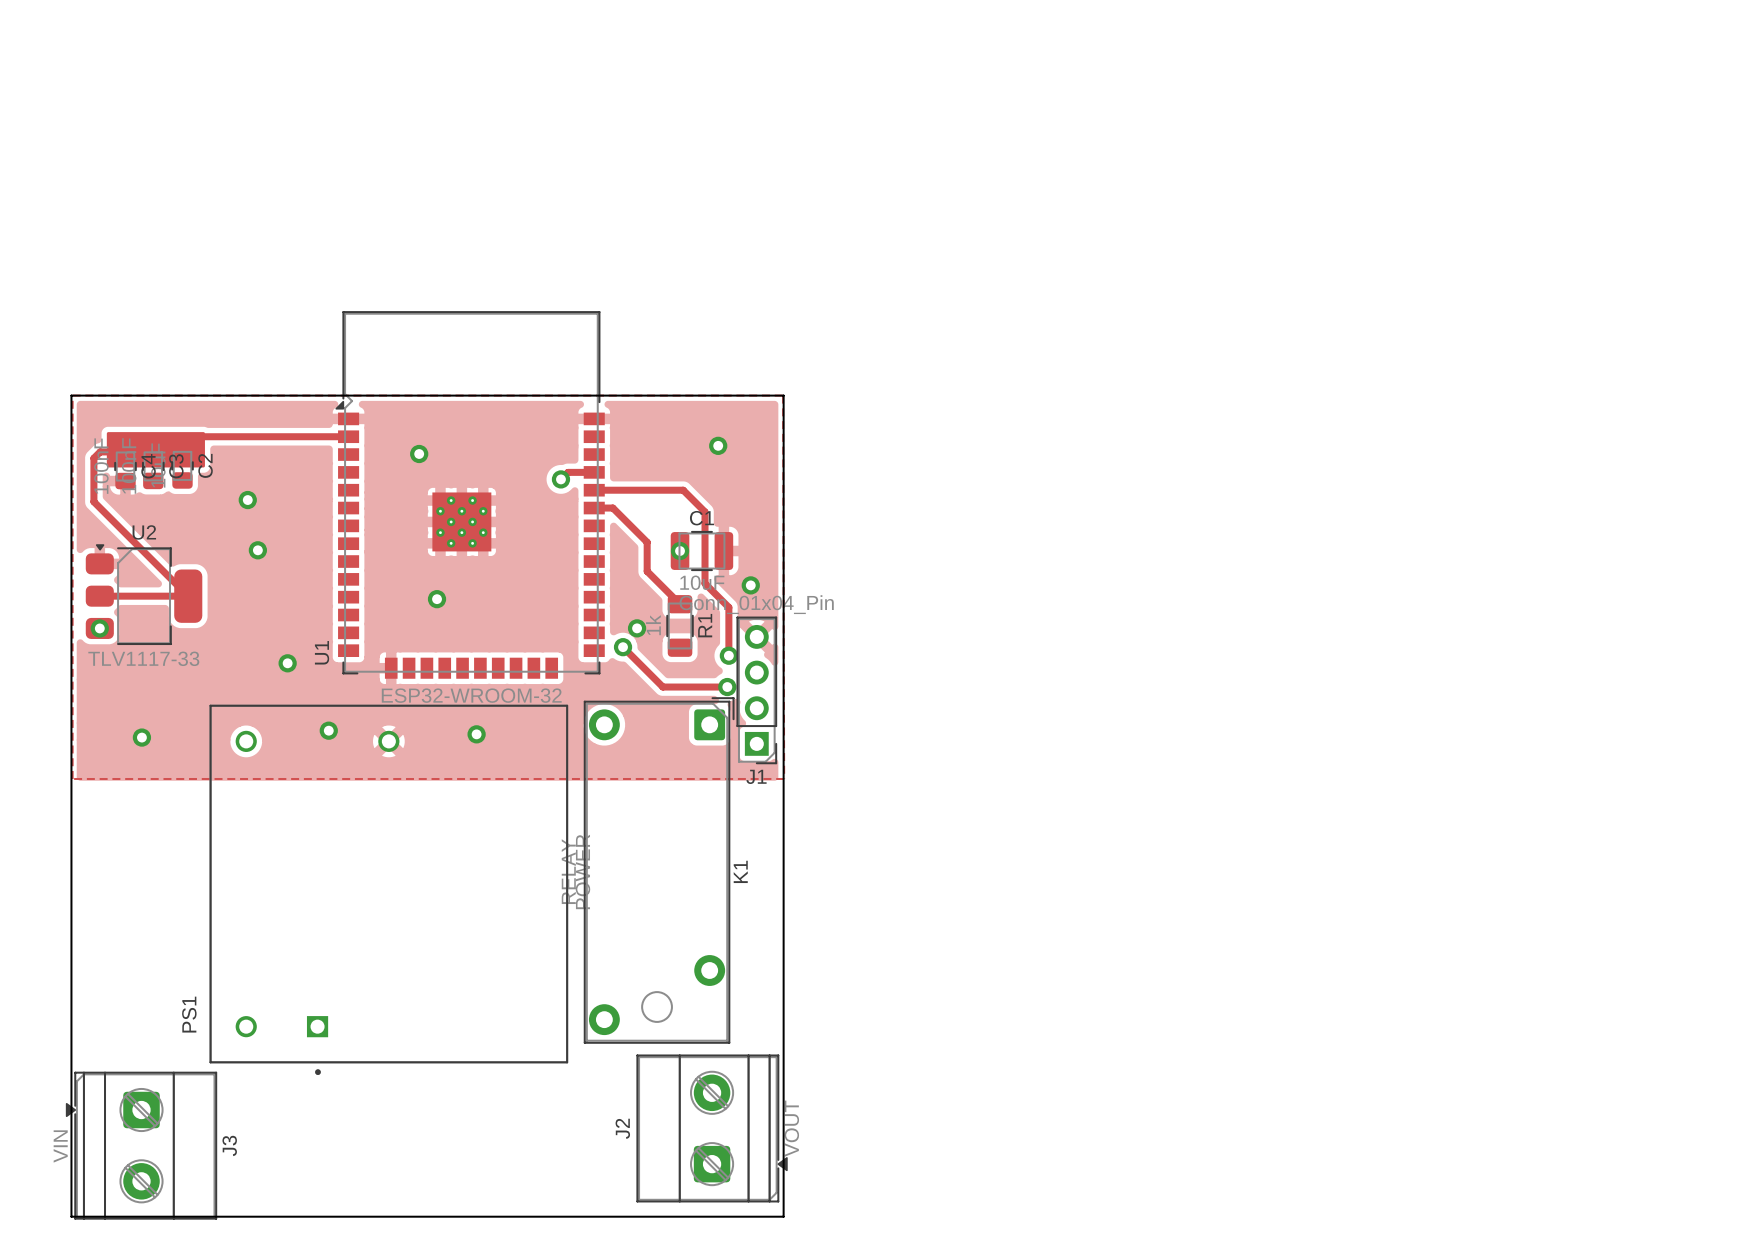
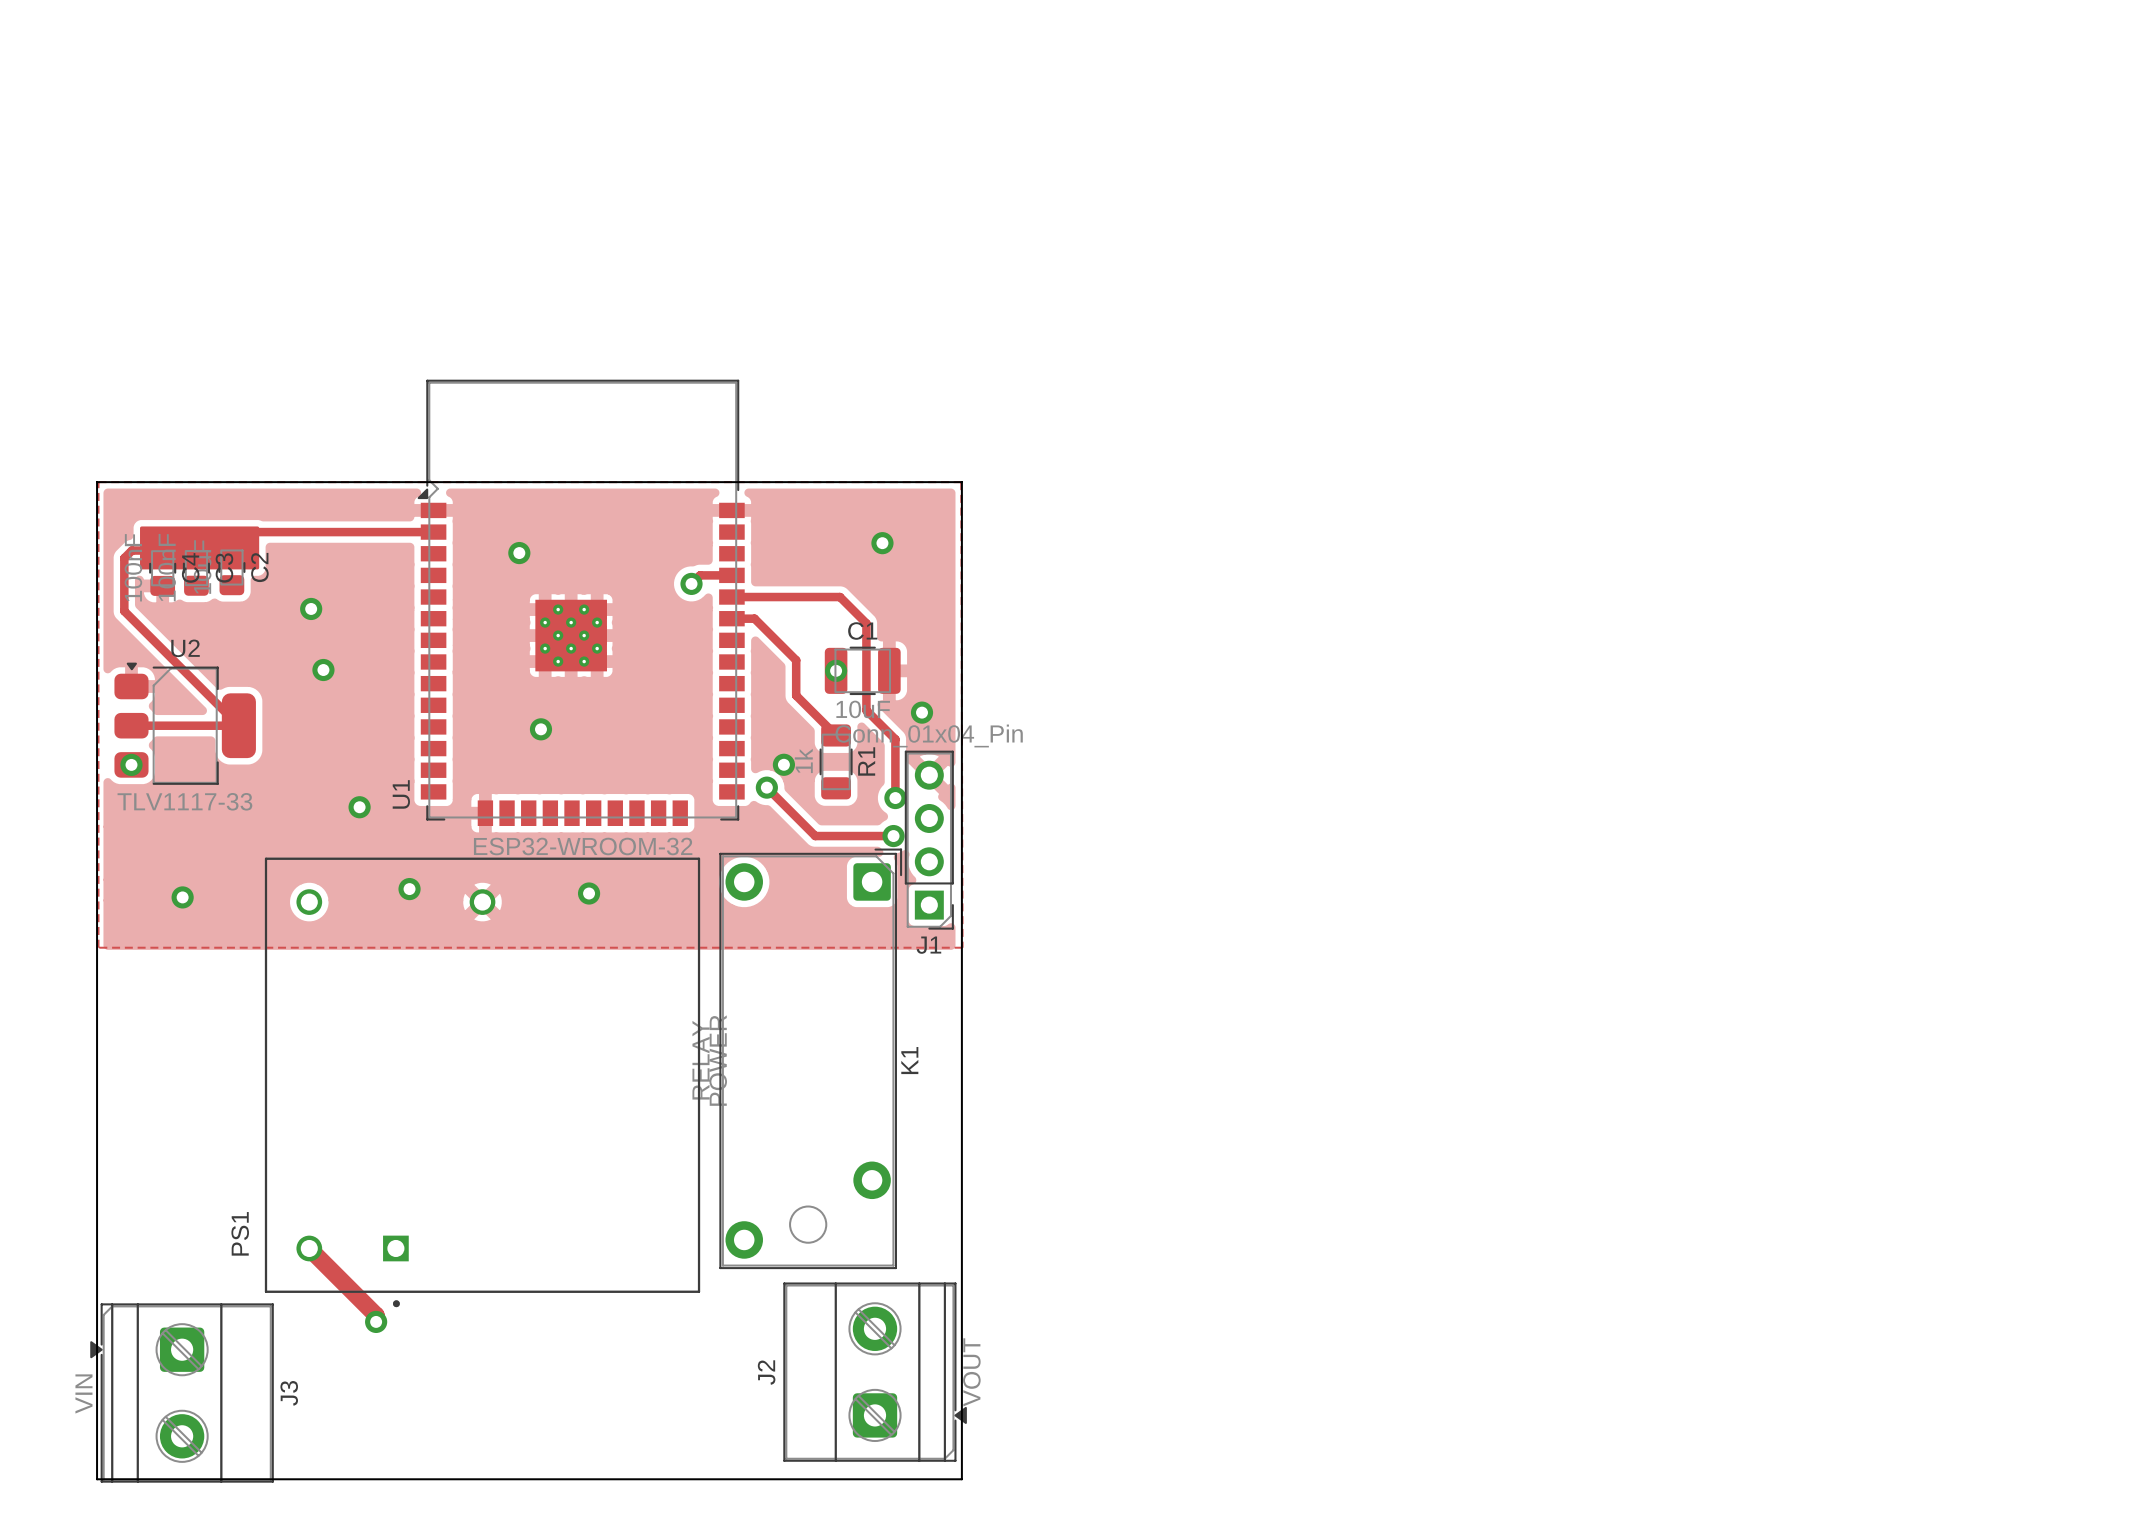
track: none -> (309, 1248) (376, 1315) (376, 1321)
via: none -> (376, 1321)

